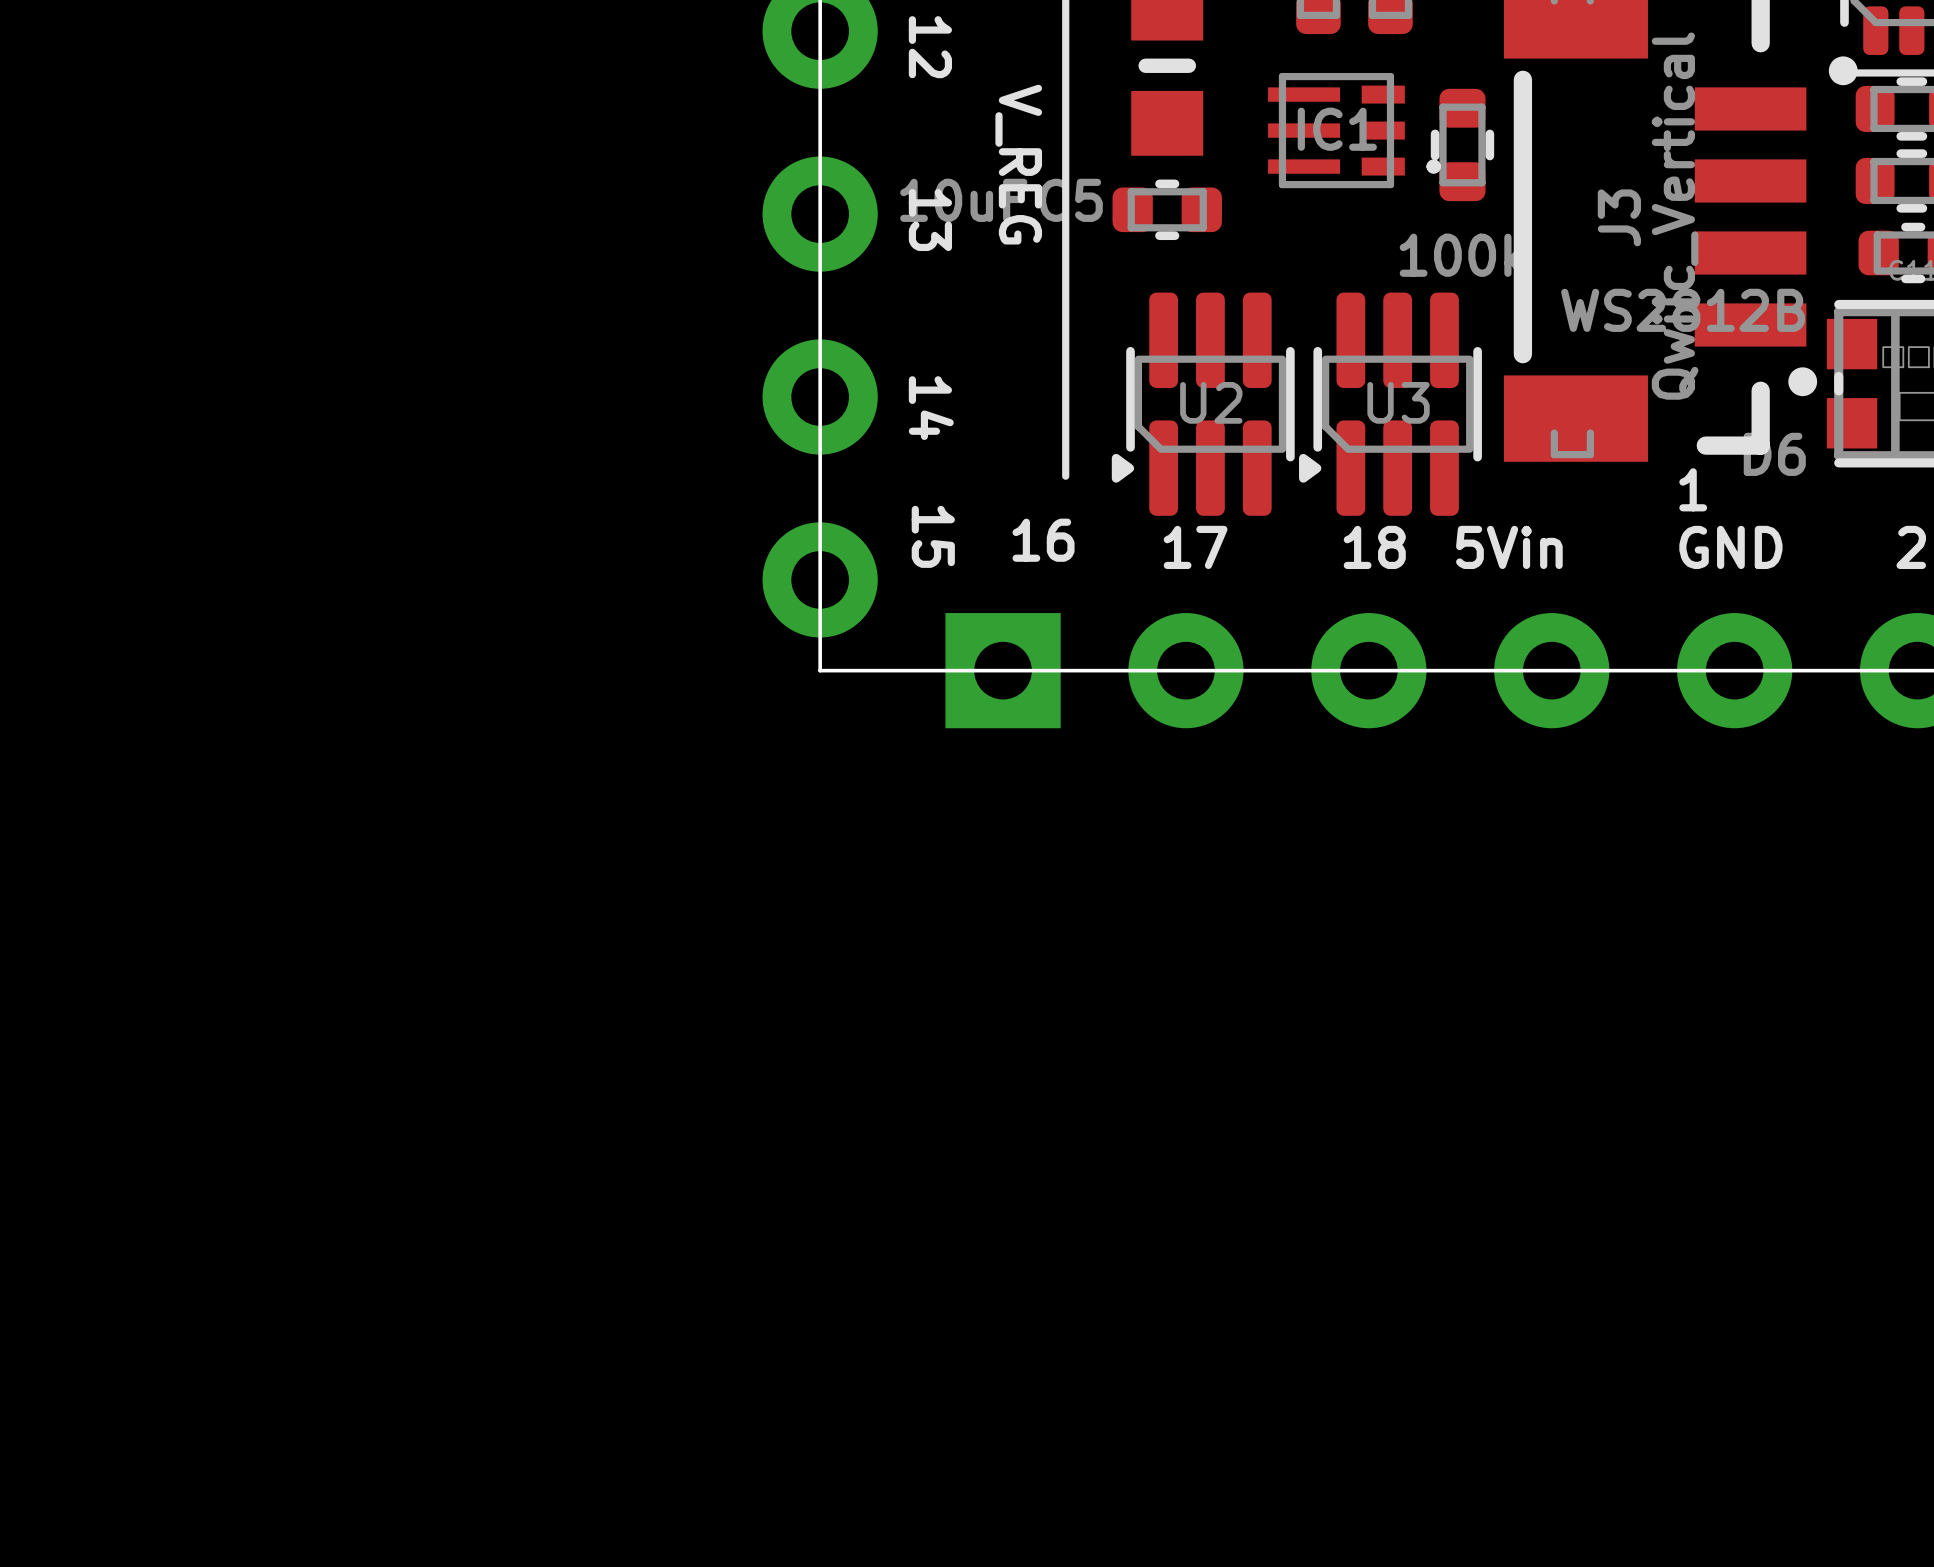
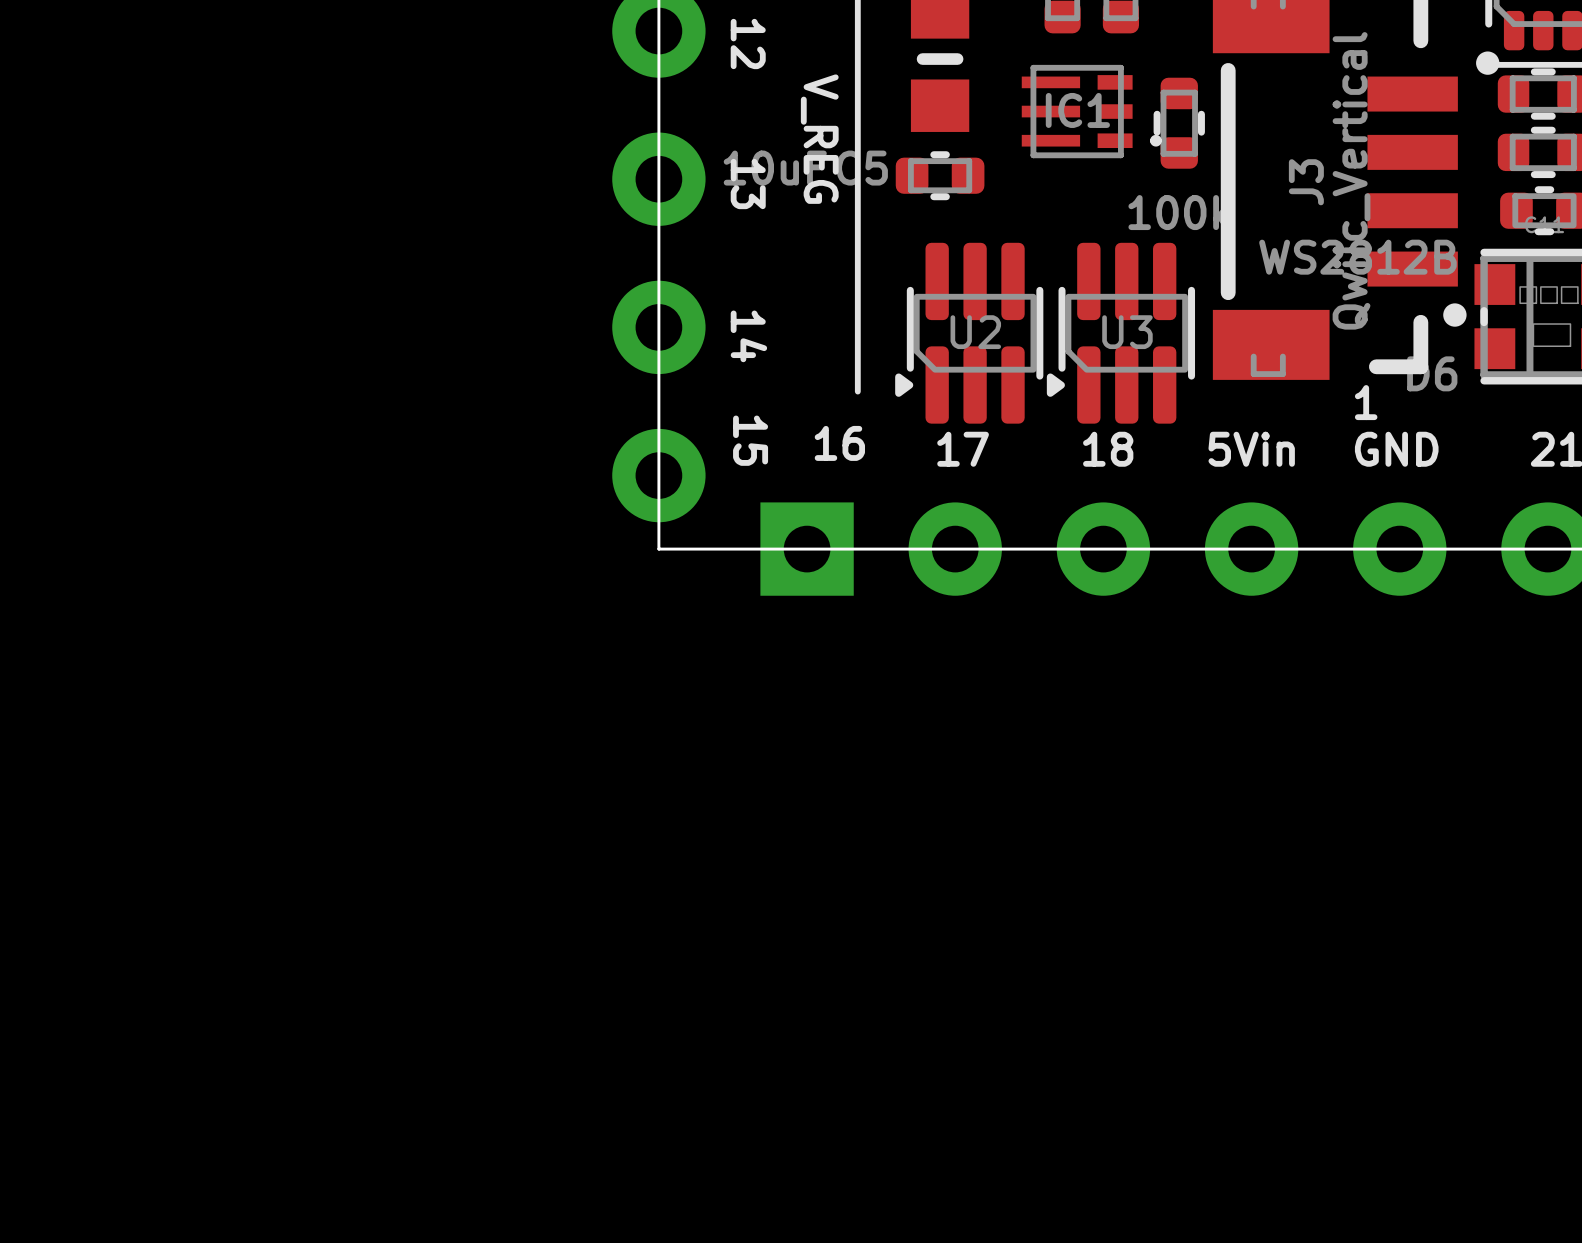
text position: 5Vin (1509, 547) -> 5Vin (1251, 449)

